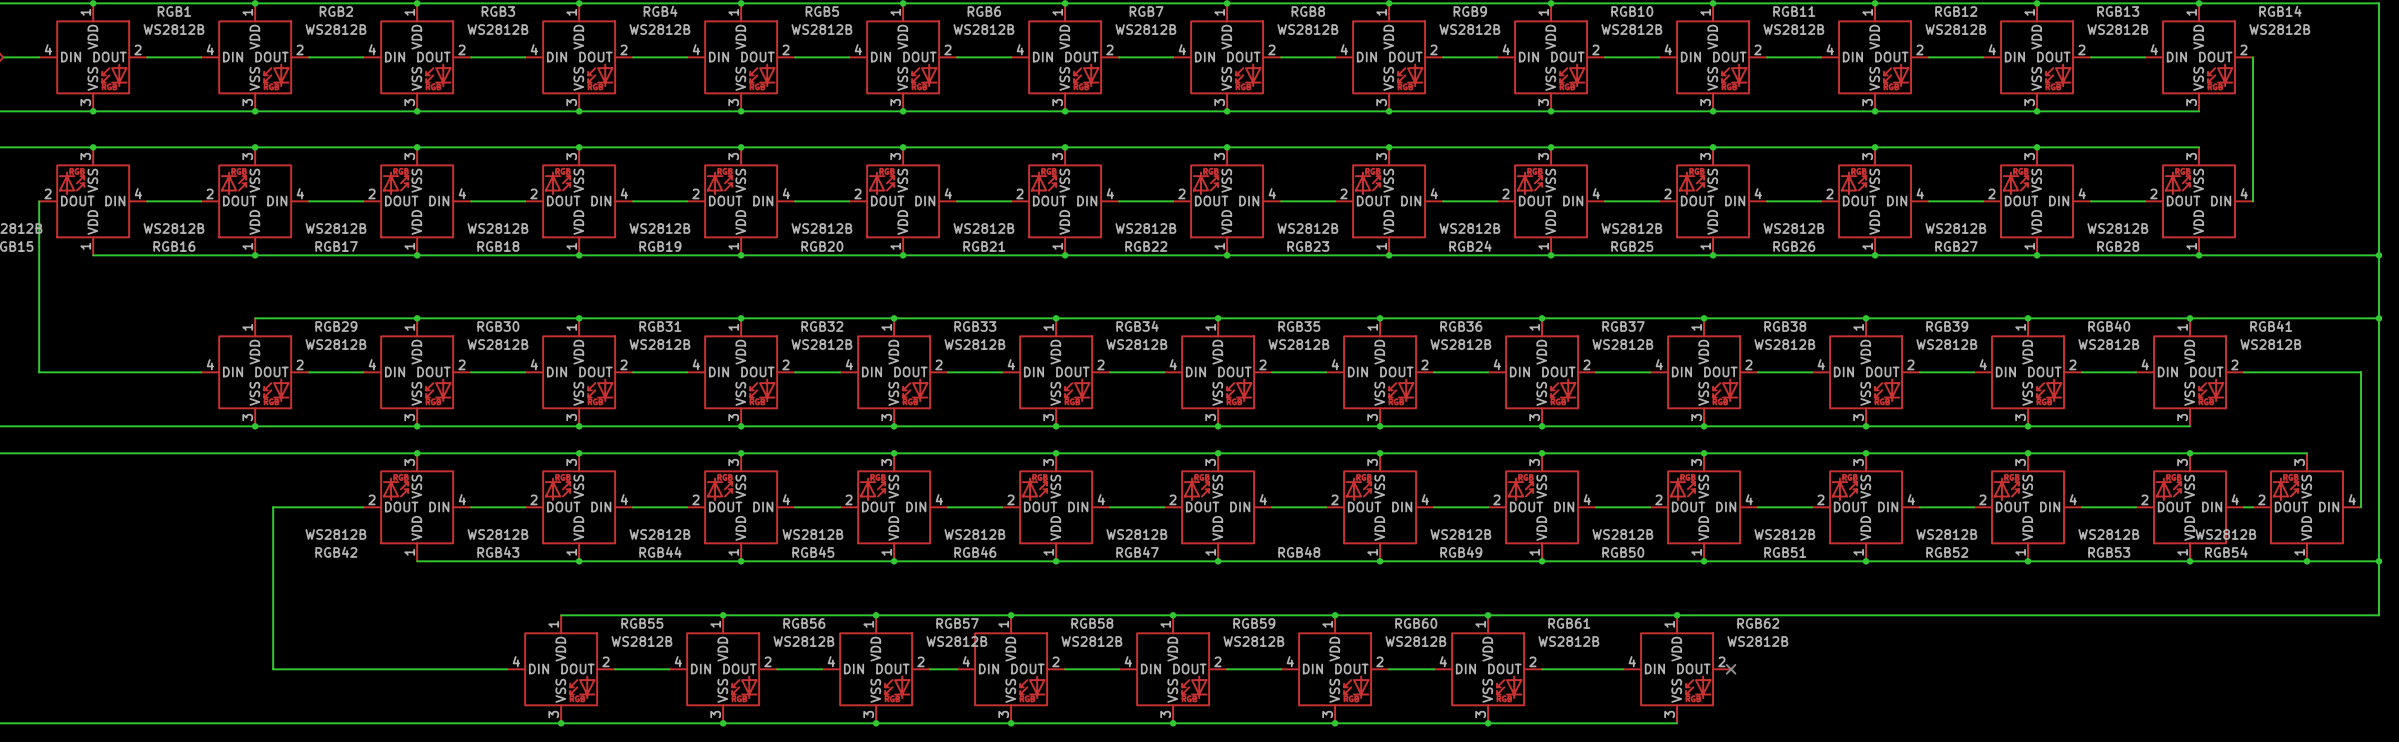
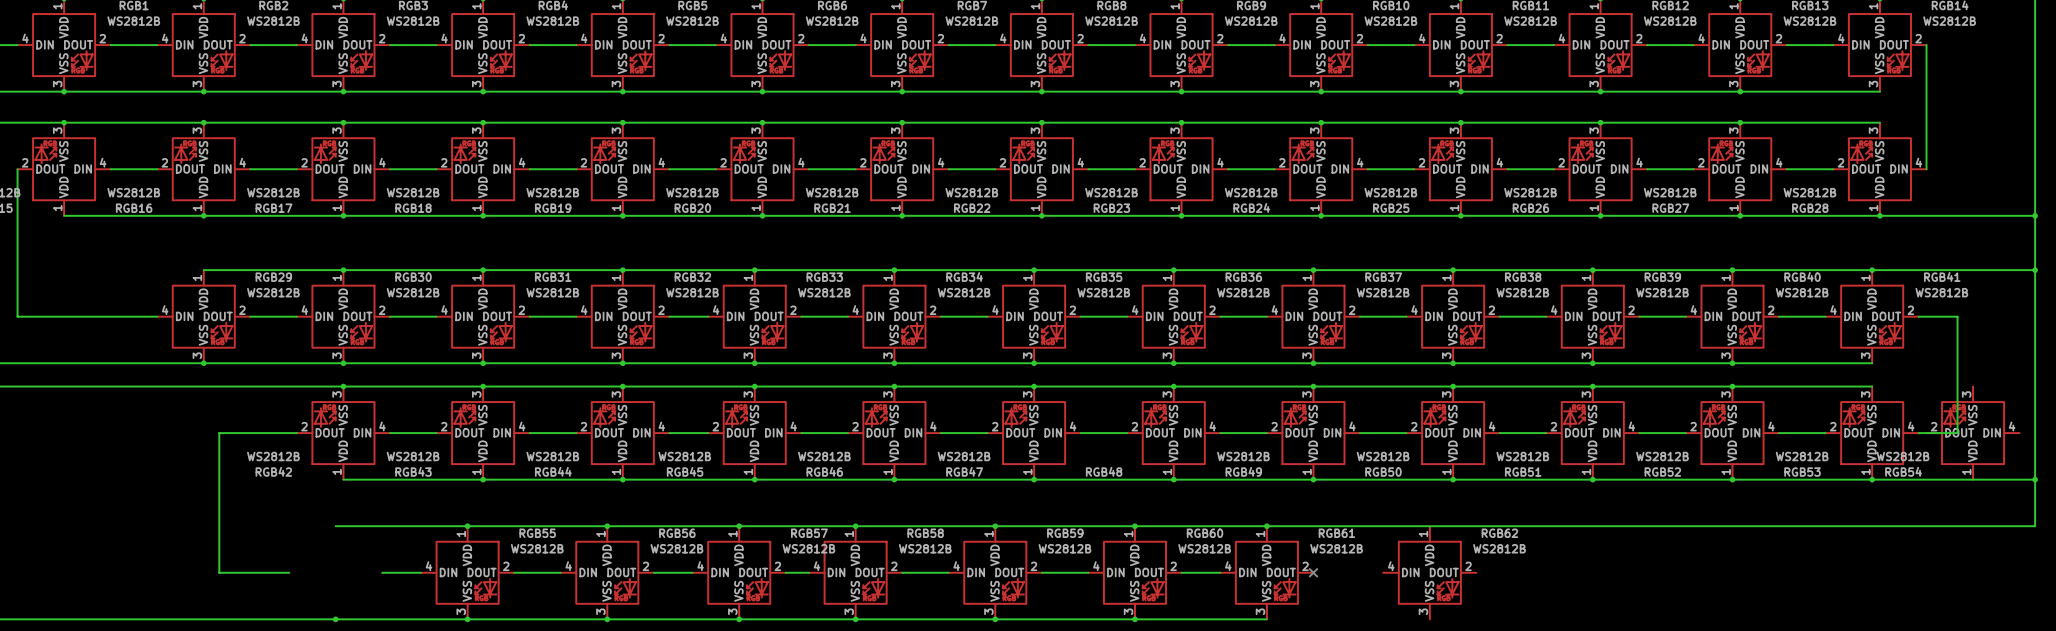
wire: (2289, 372) (2361, 372) (2361, 507) -> (1957, 316) (1957, 433) (1926, 433)
wire: (2190, 453) (2307, 453) -> none
junction: (2190, 453) -> none
junction: (2307, 561) -> none
wire: none -> (335, 526) (467, 526)
junction: none -> (467, 526)
junction: (1677, 615) -> none
wire: (354, 669) (462, 669) -> none
wire: (1542, 669) (1623, 669) -> none
no-connect mark: none -> (1313, 572)
no-connect mark: (1731, 669) -> none
junction: none -> (335, 619)
wire: (1488, 723) (1677, 723) -> none
junction: (1488, 723) -> none

